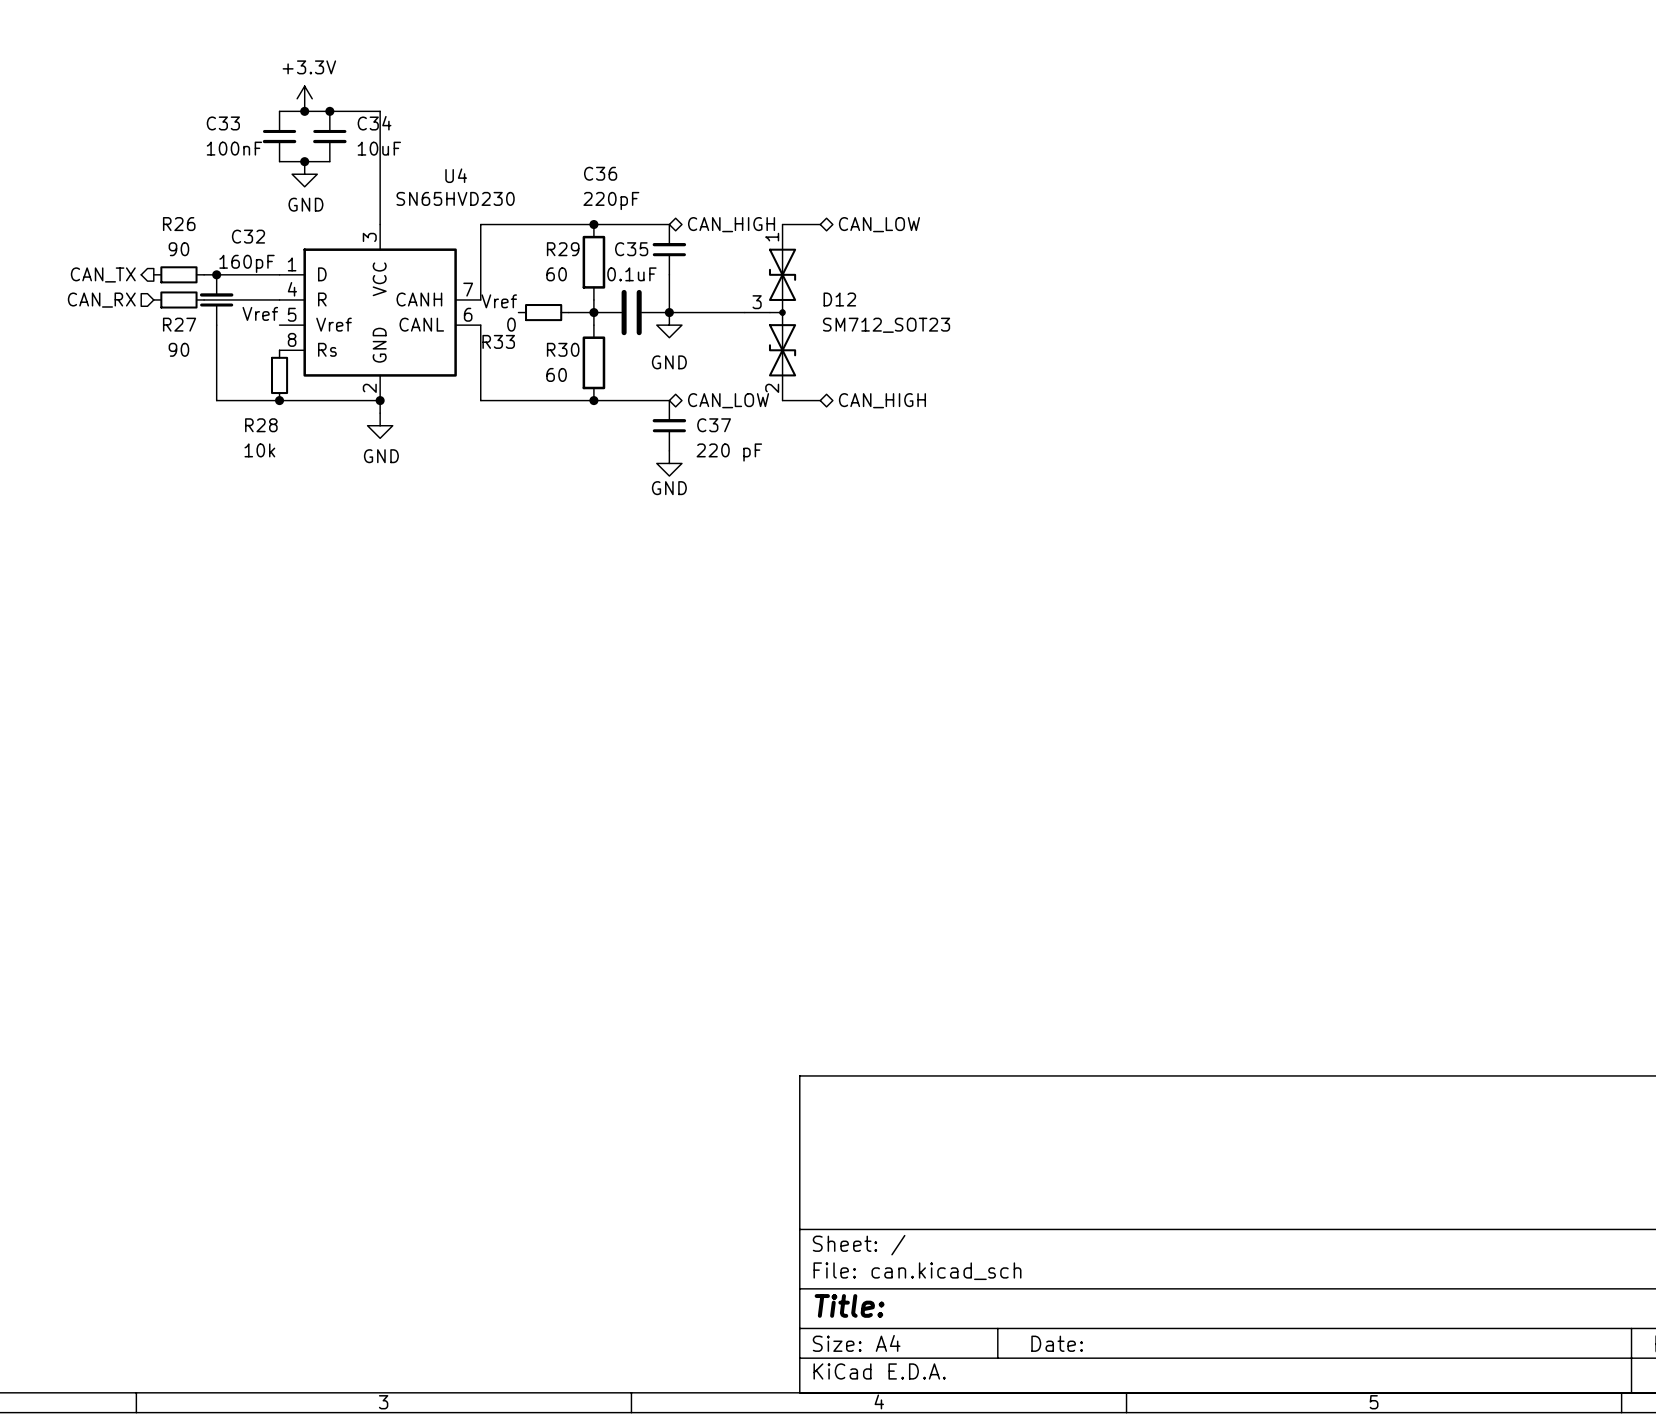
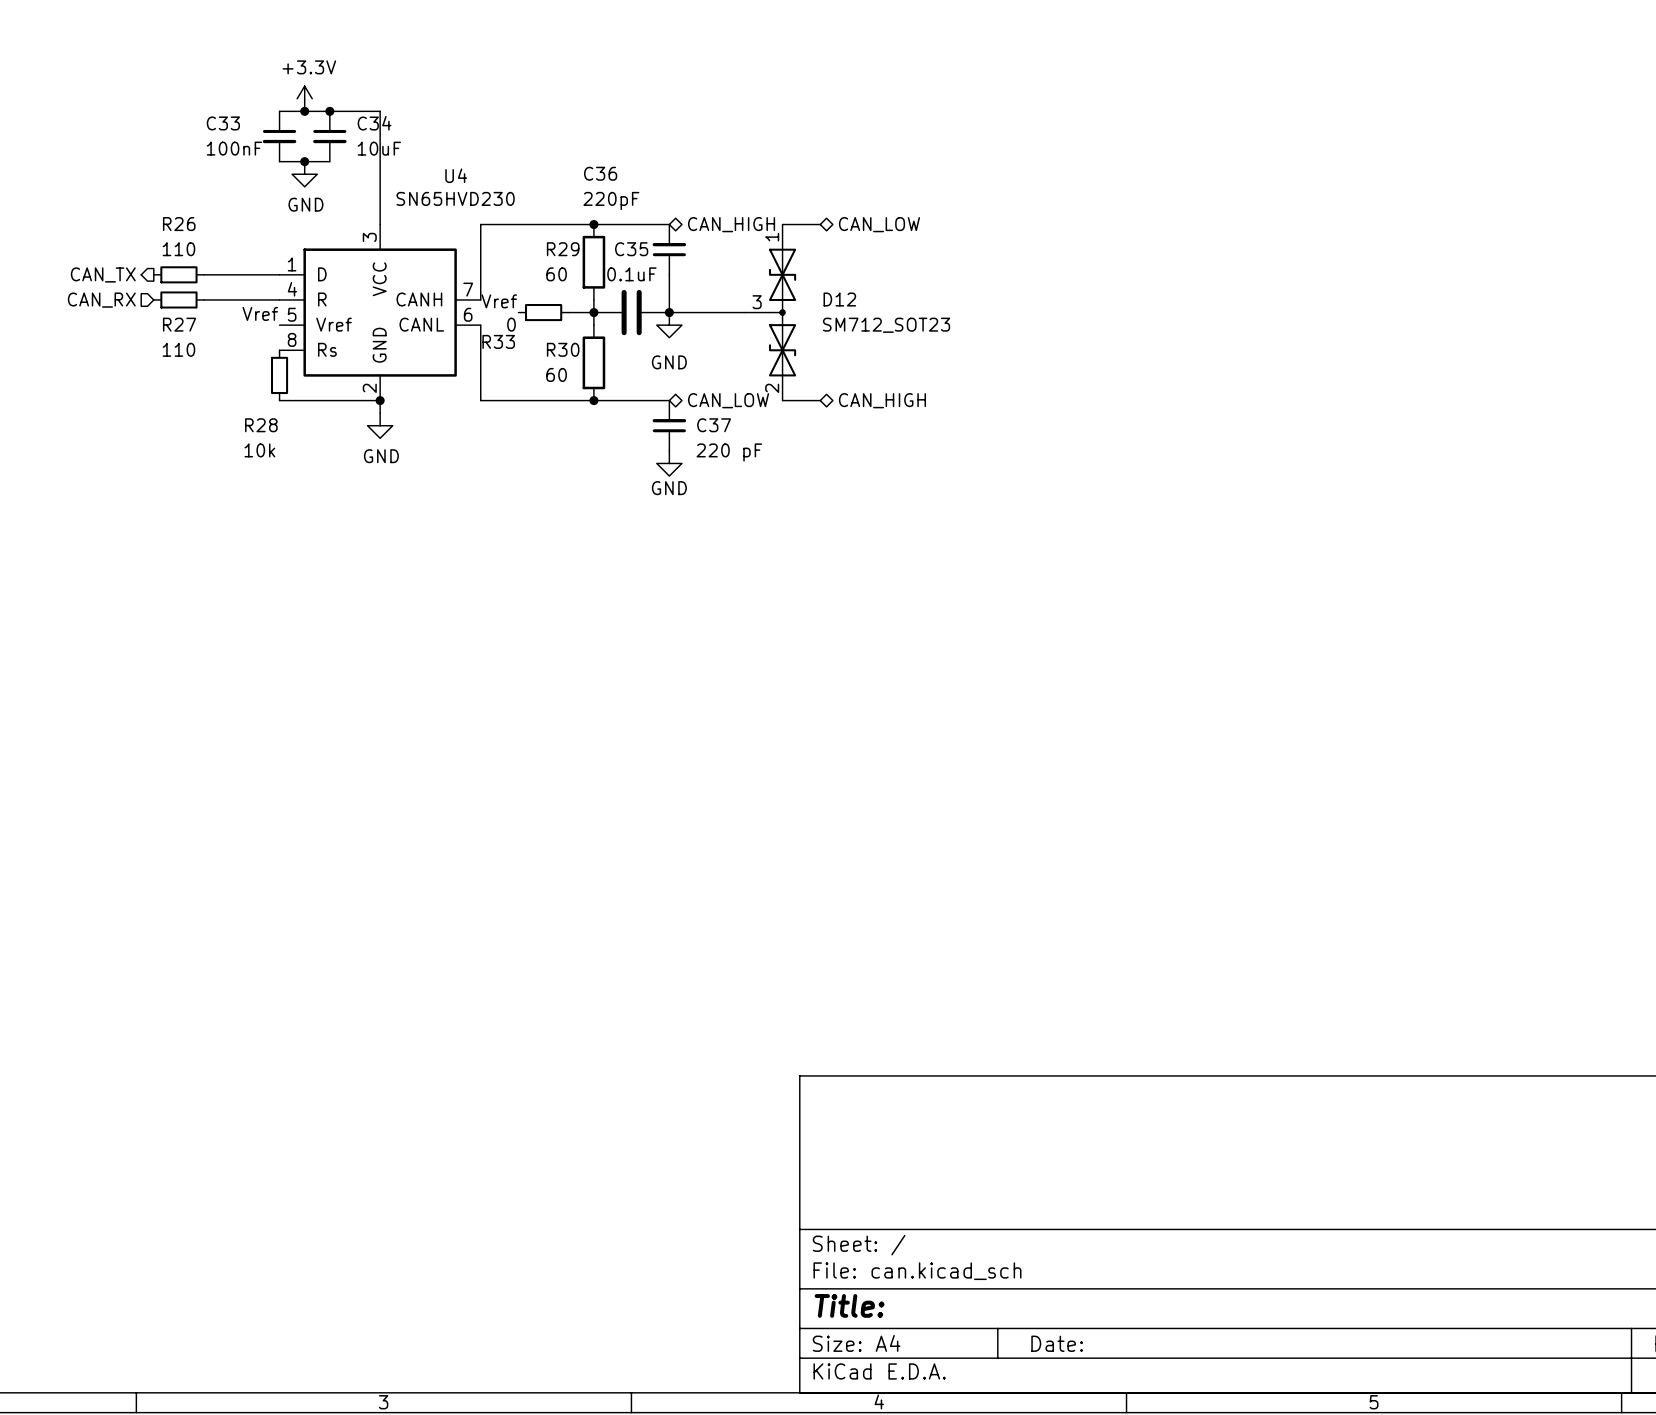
R26 value: 90 (178, 249) -> 110 (178, 249)
junction: (216, 274) -> none
C32: 160pF (216, 299) -> none
wire: (216, 325) (216, 400) (279, 400) -> none
R27 value: 90 (178, 349) -> 110 (178, 349)
junction: (279, 400) -> none

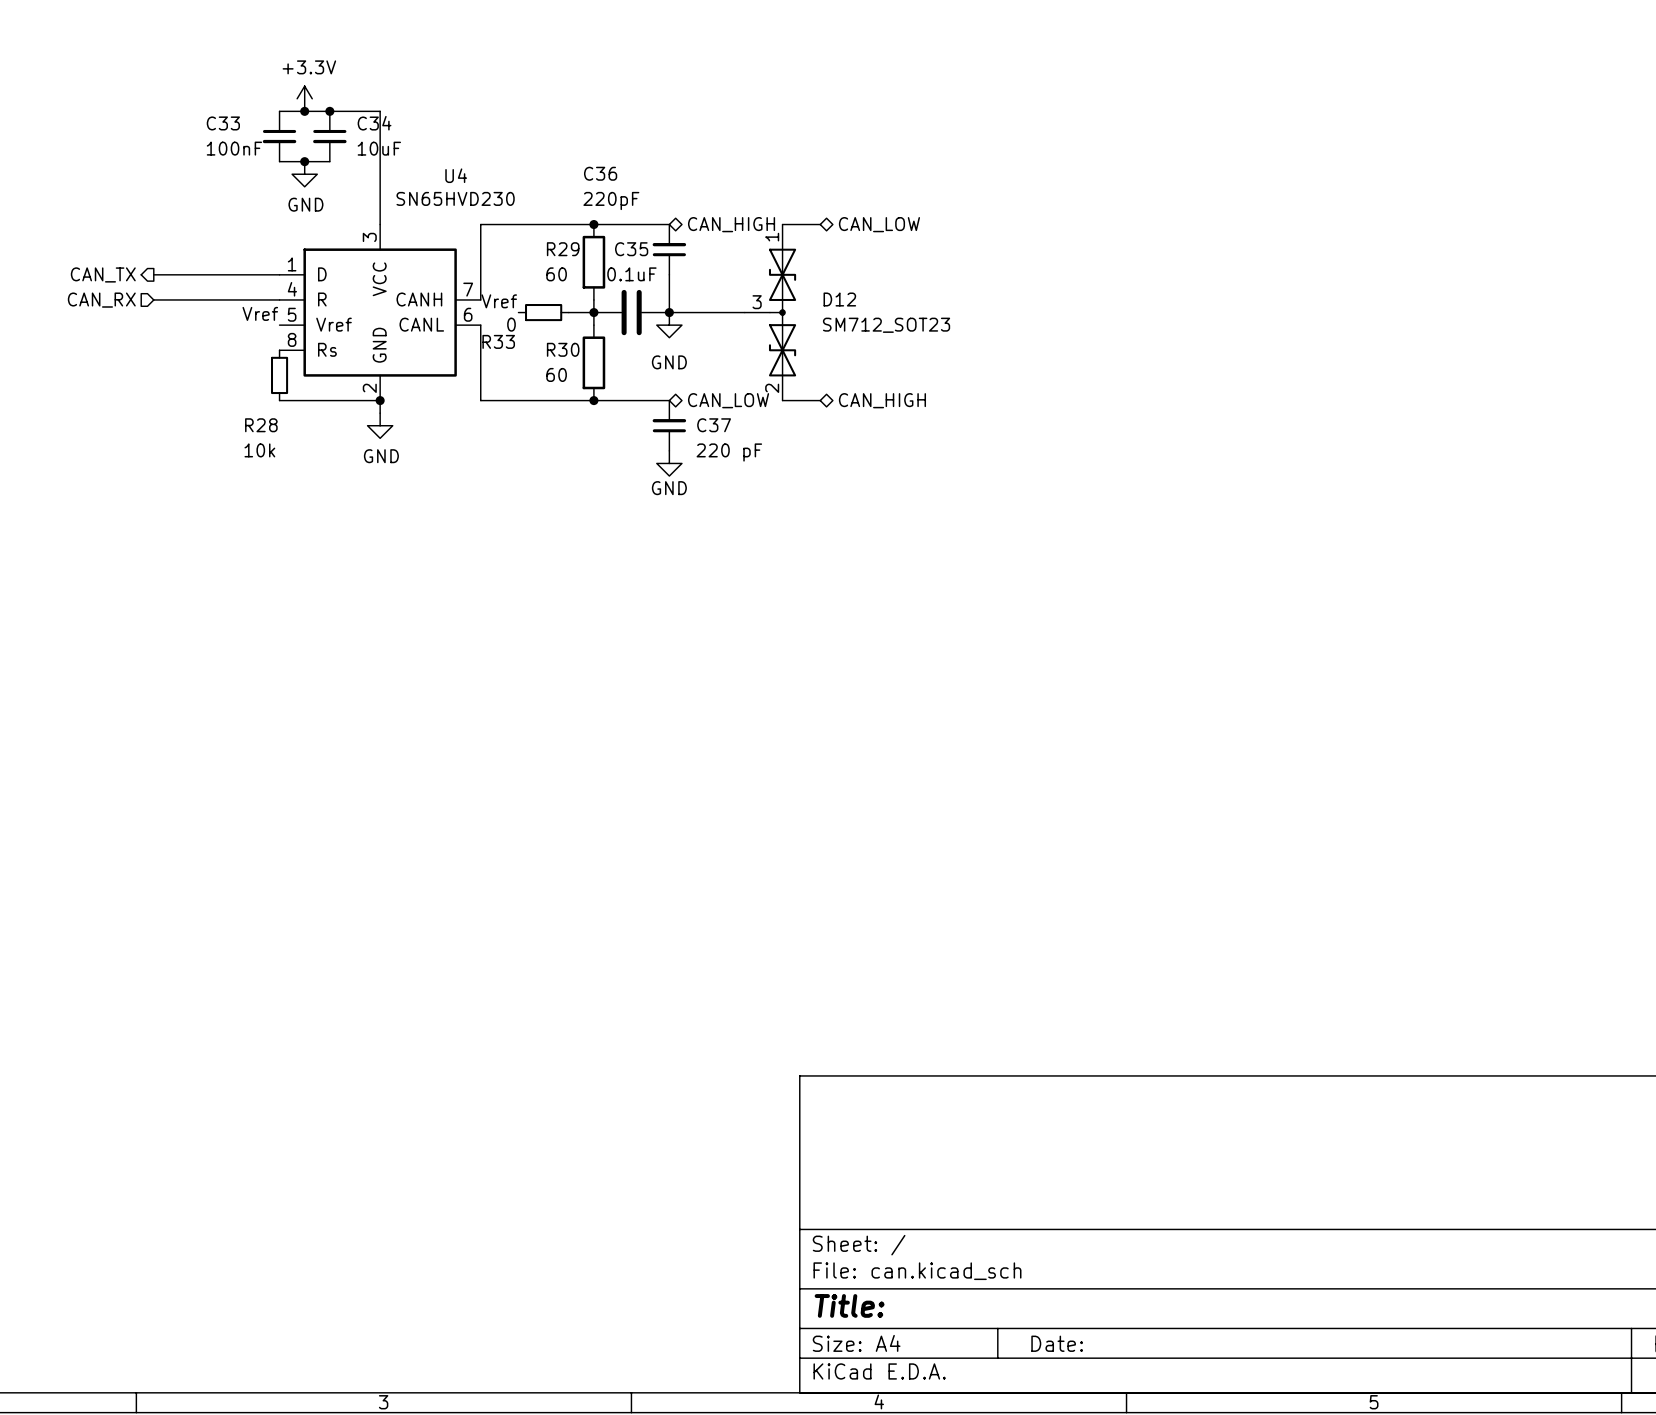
wire: none -> (153, 274) (204, 274)
R26: 110 (178, 274) -> none
wire: none -> (153, 299) (204, 299)
R27: 110 (178, 299) -> none

